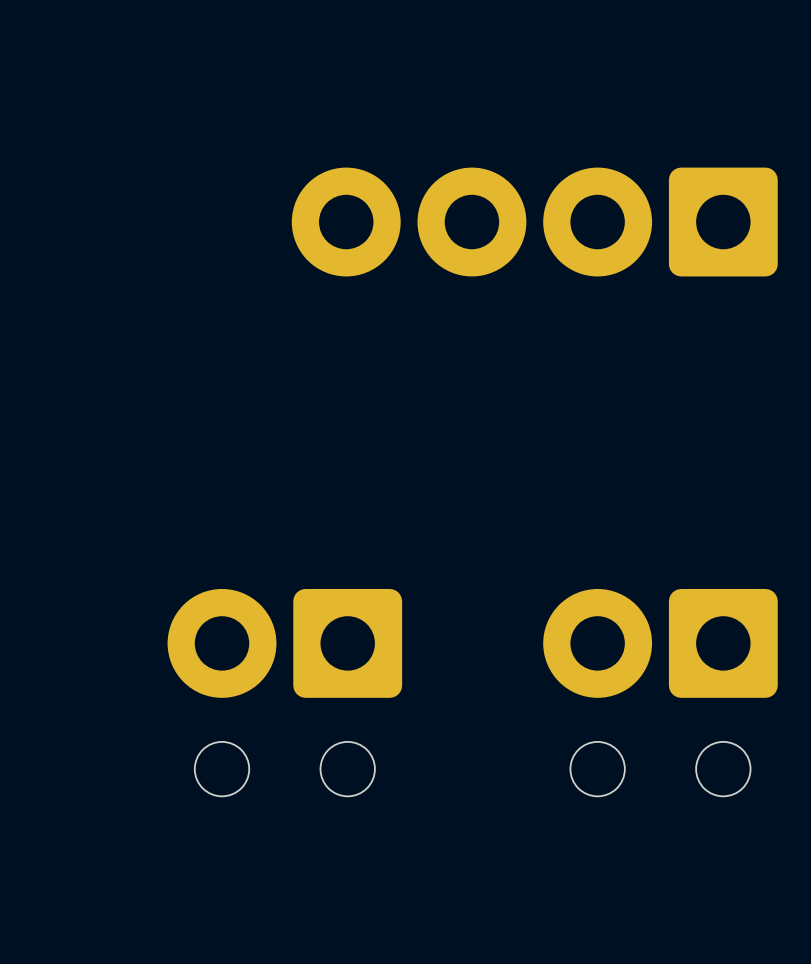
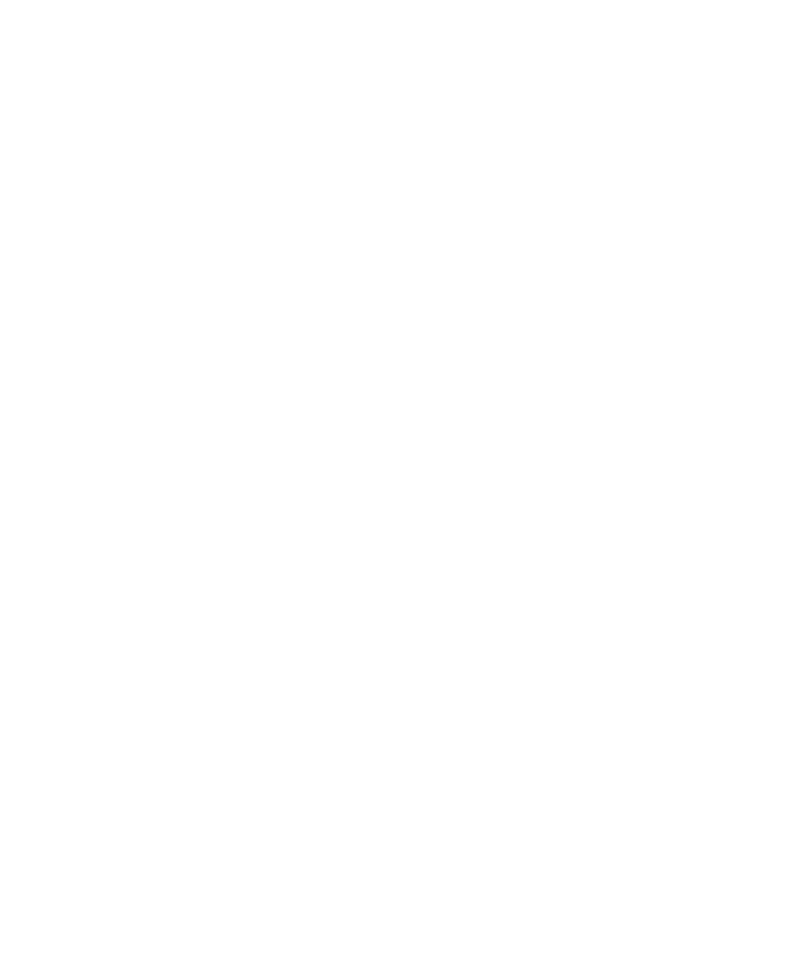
part: (534, 222) -> none
part: (284, 692) -> none
part: (660, 692) -> none

